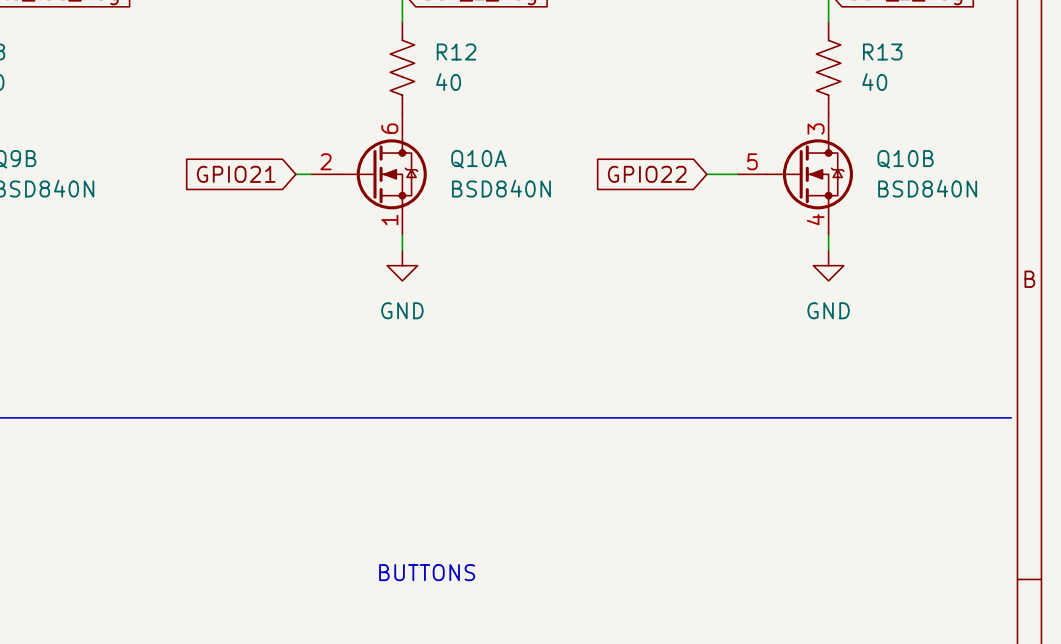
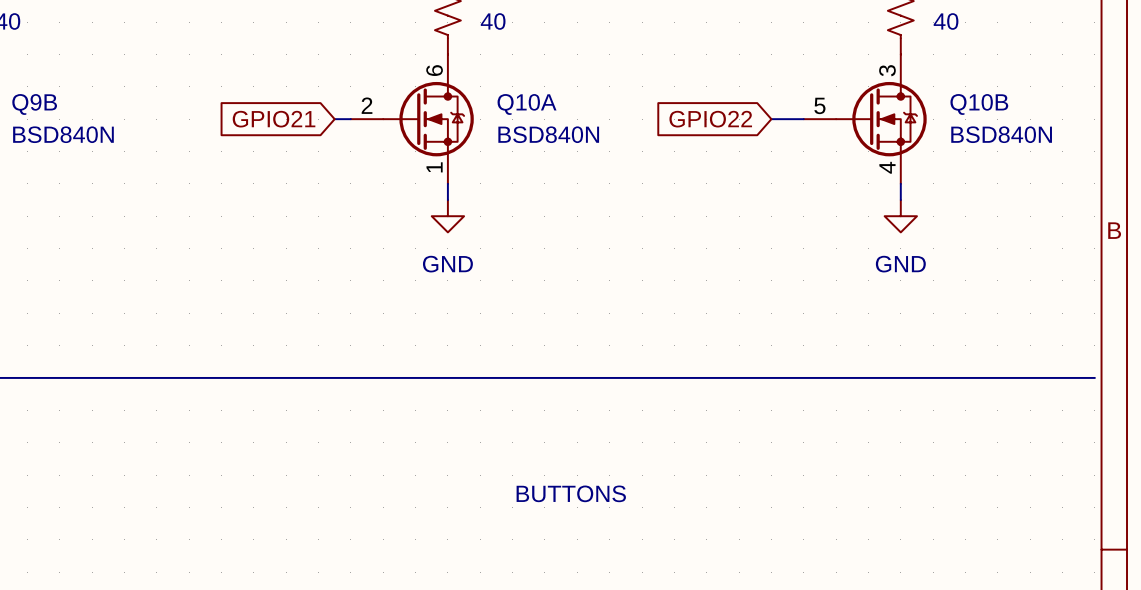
text position: BUTTONS (427, 572) -> BUTTONS (571, 493)

